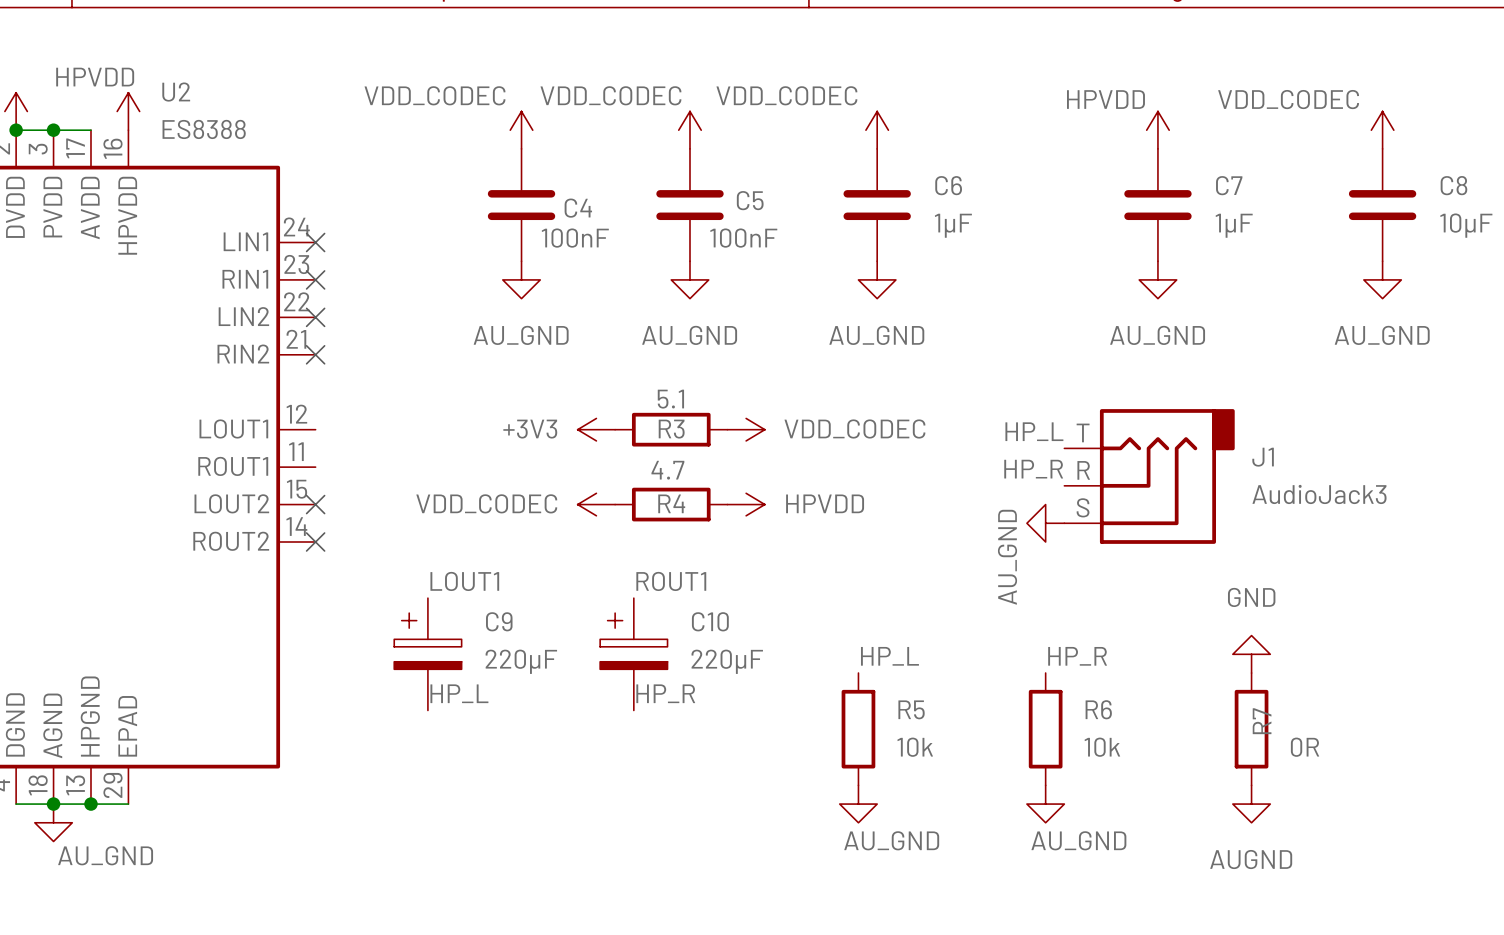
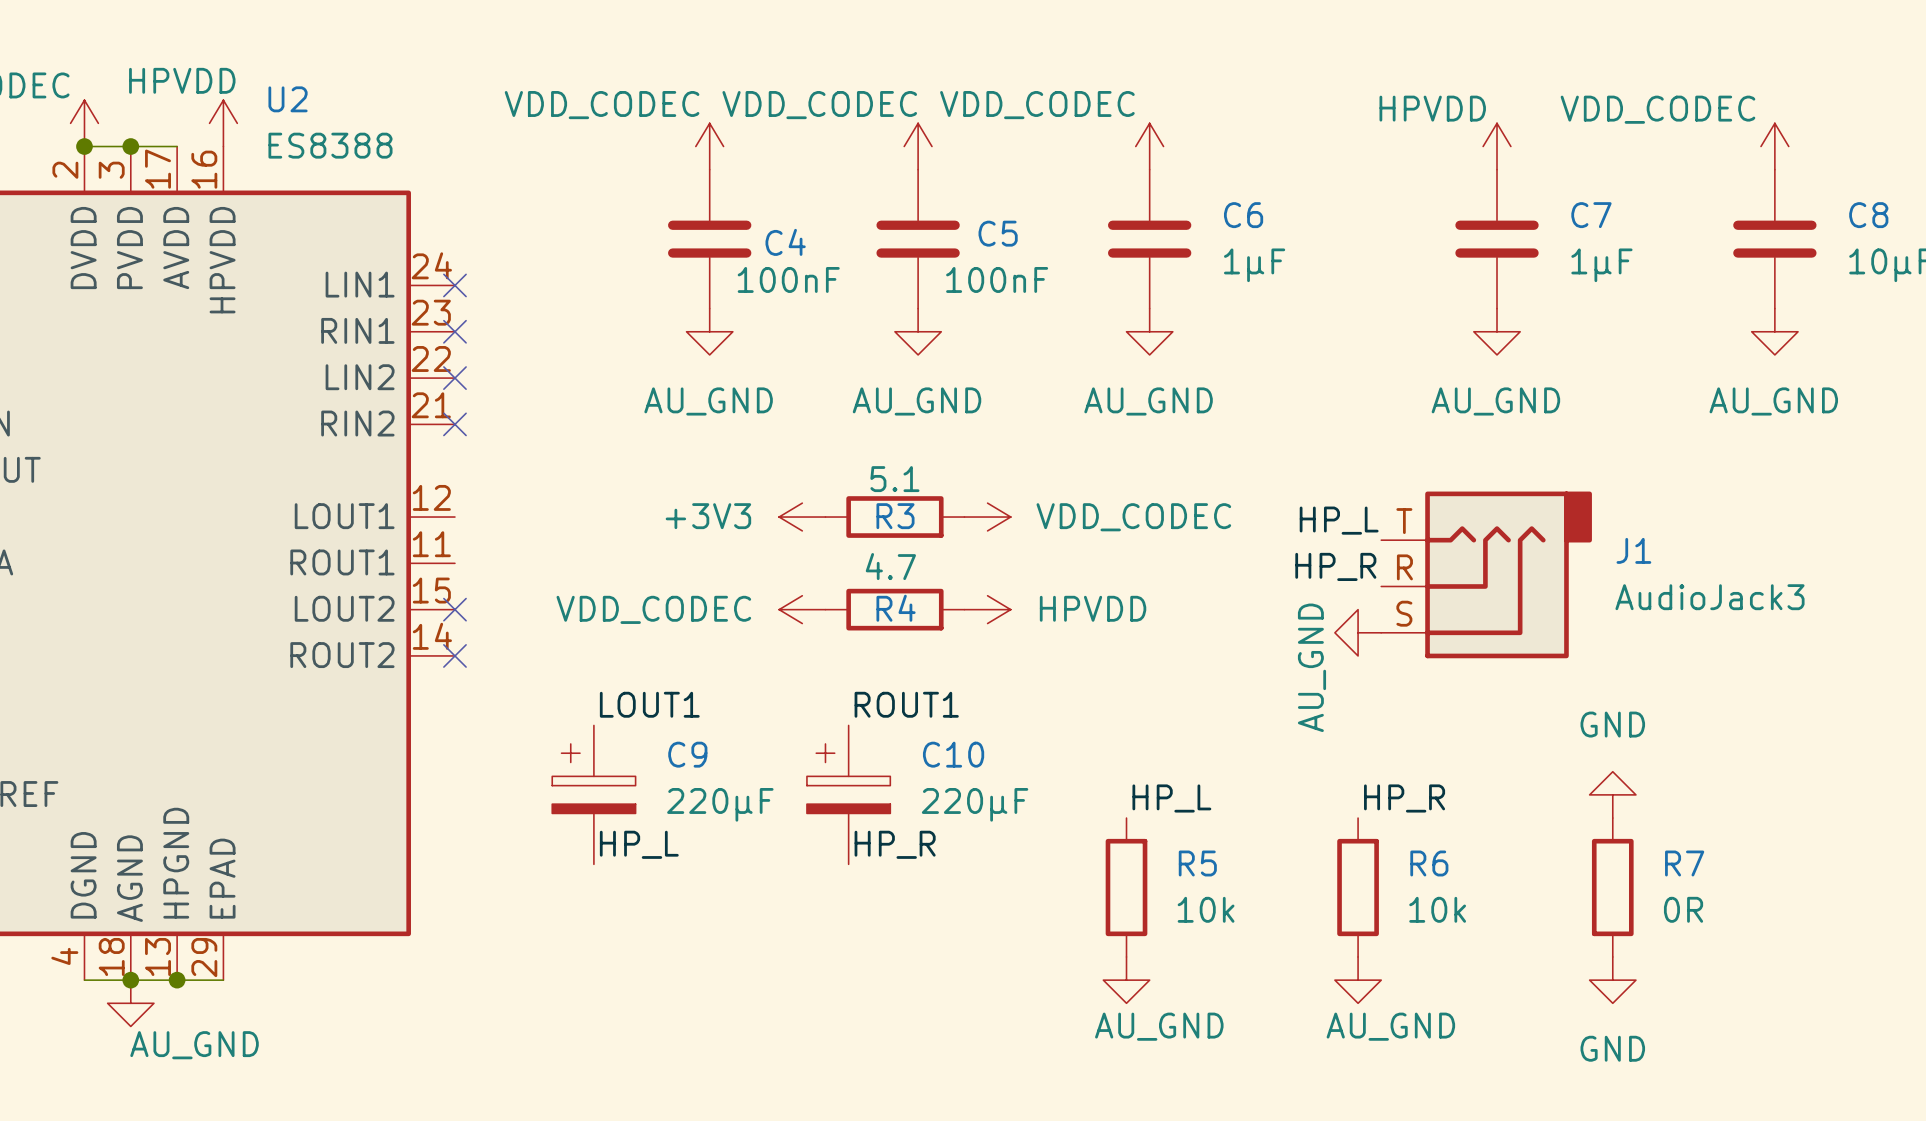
R7 name rotation: 0° (1262, 721) -> 90° clockwise (1684, 863)
R7 name position: R7 (1262, 721) -> R7 (1684, 863)
power symbol: AUGND (1251, 804) -> GND (1612, 980)

